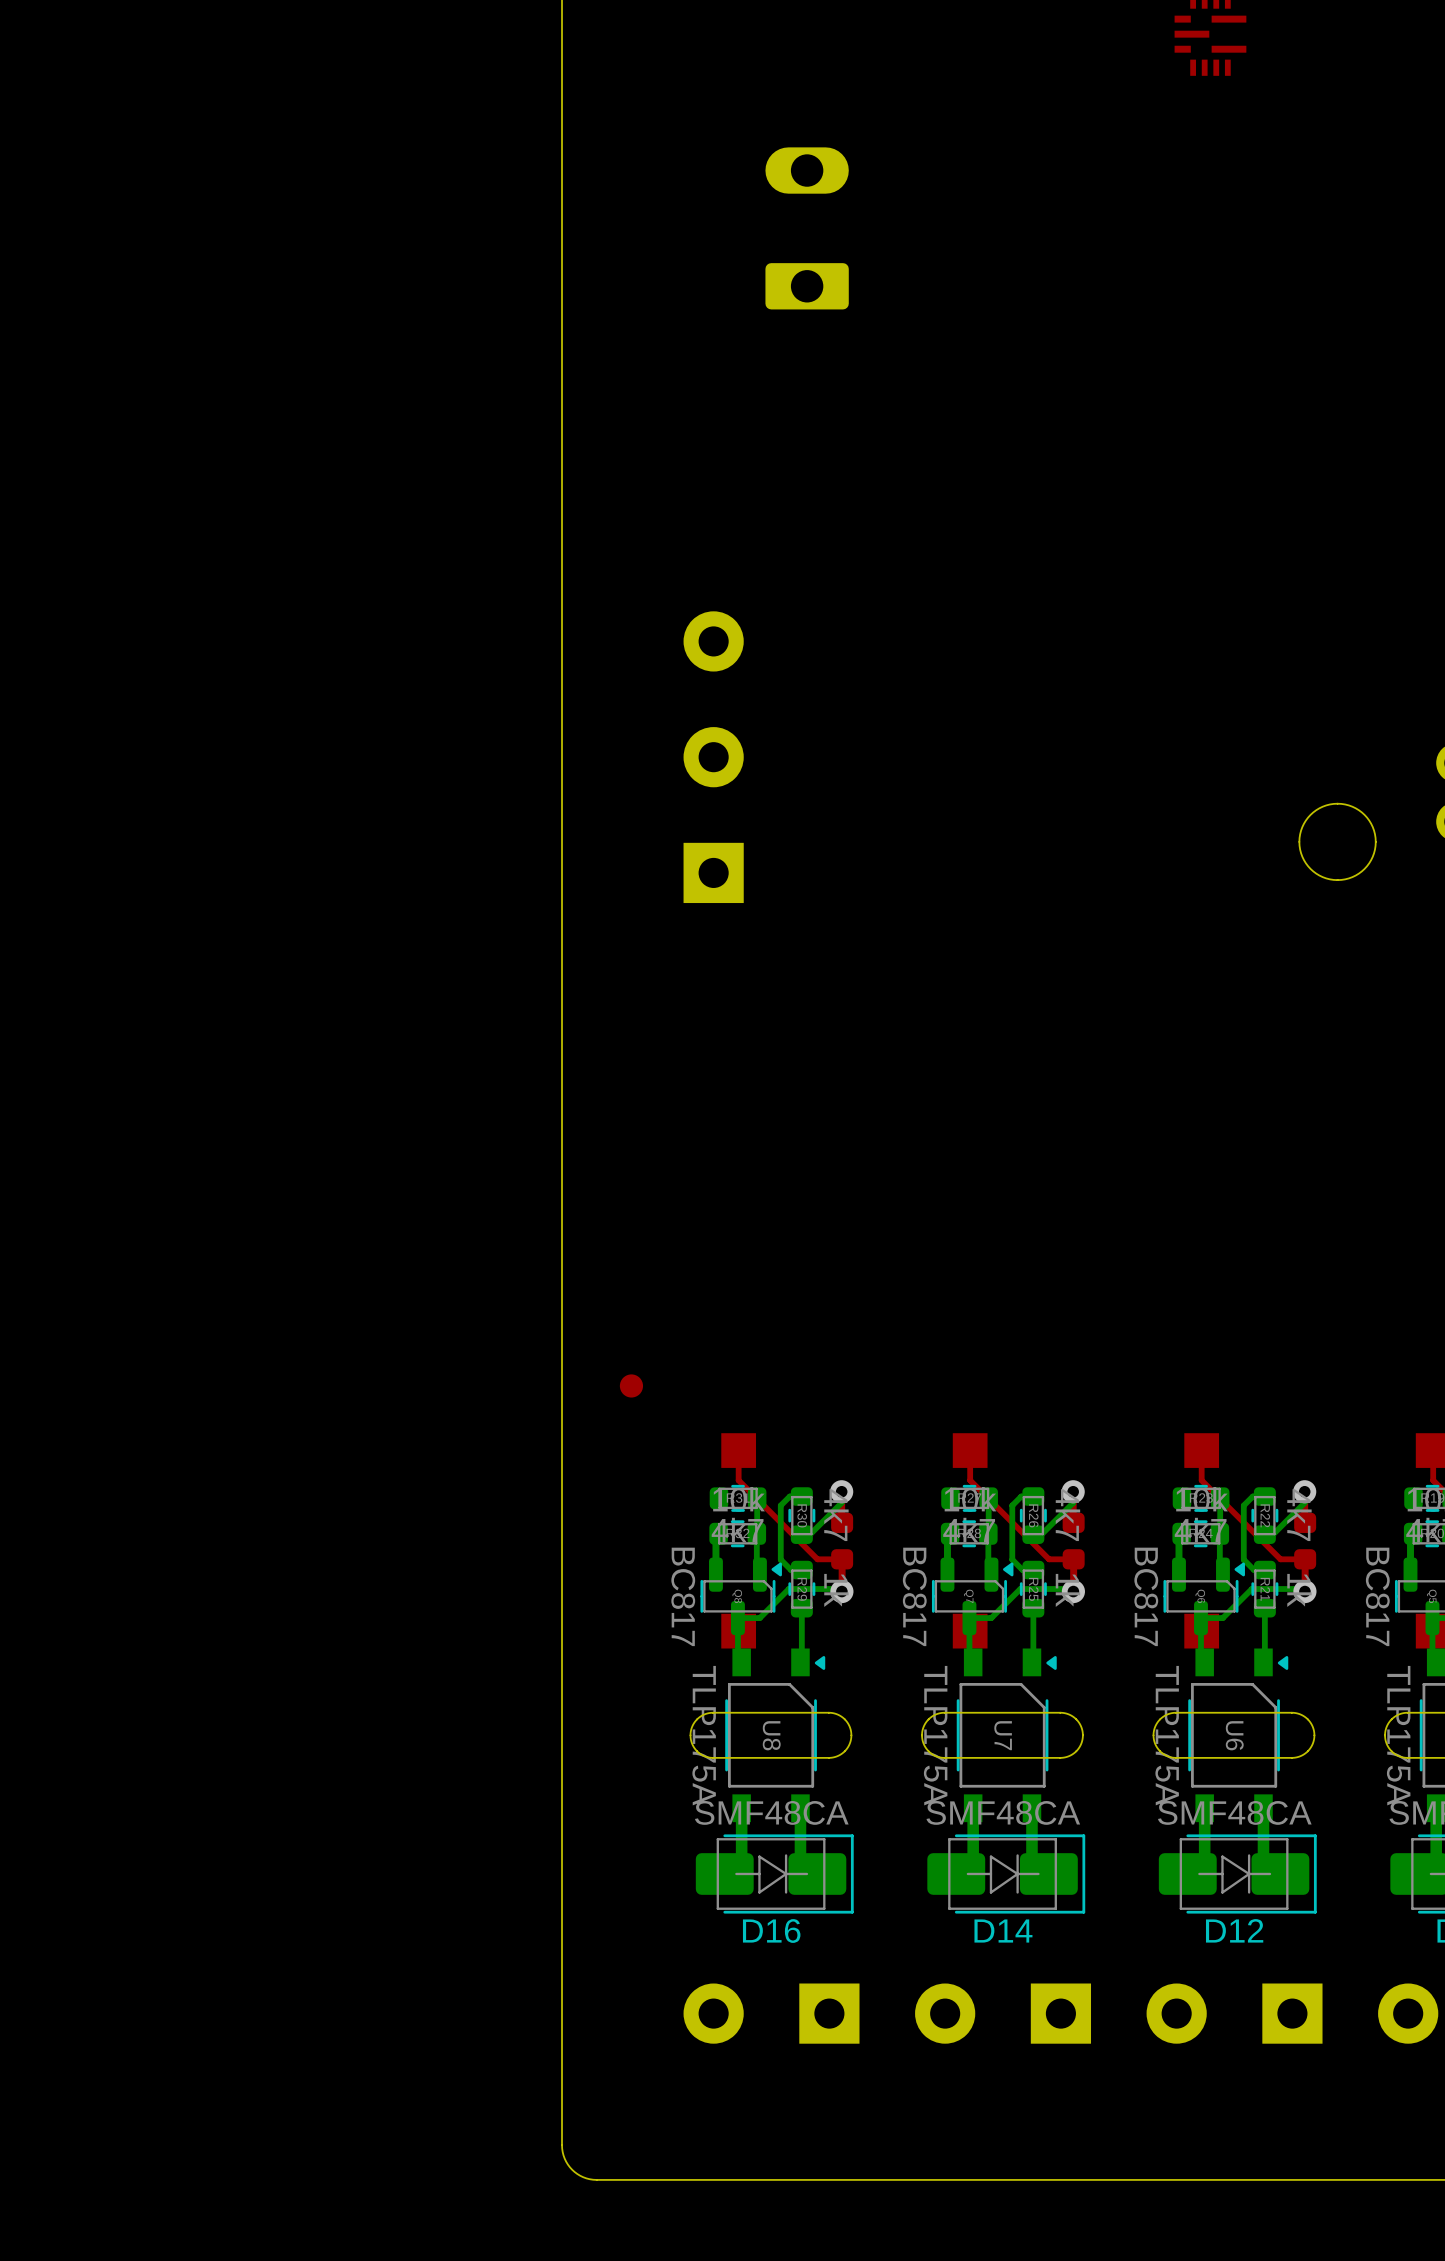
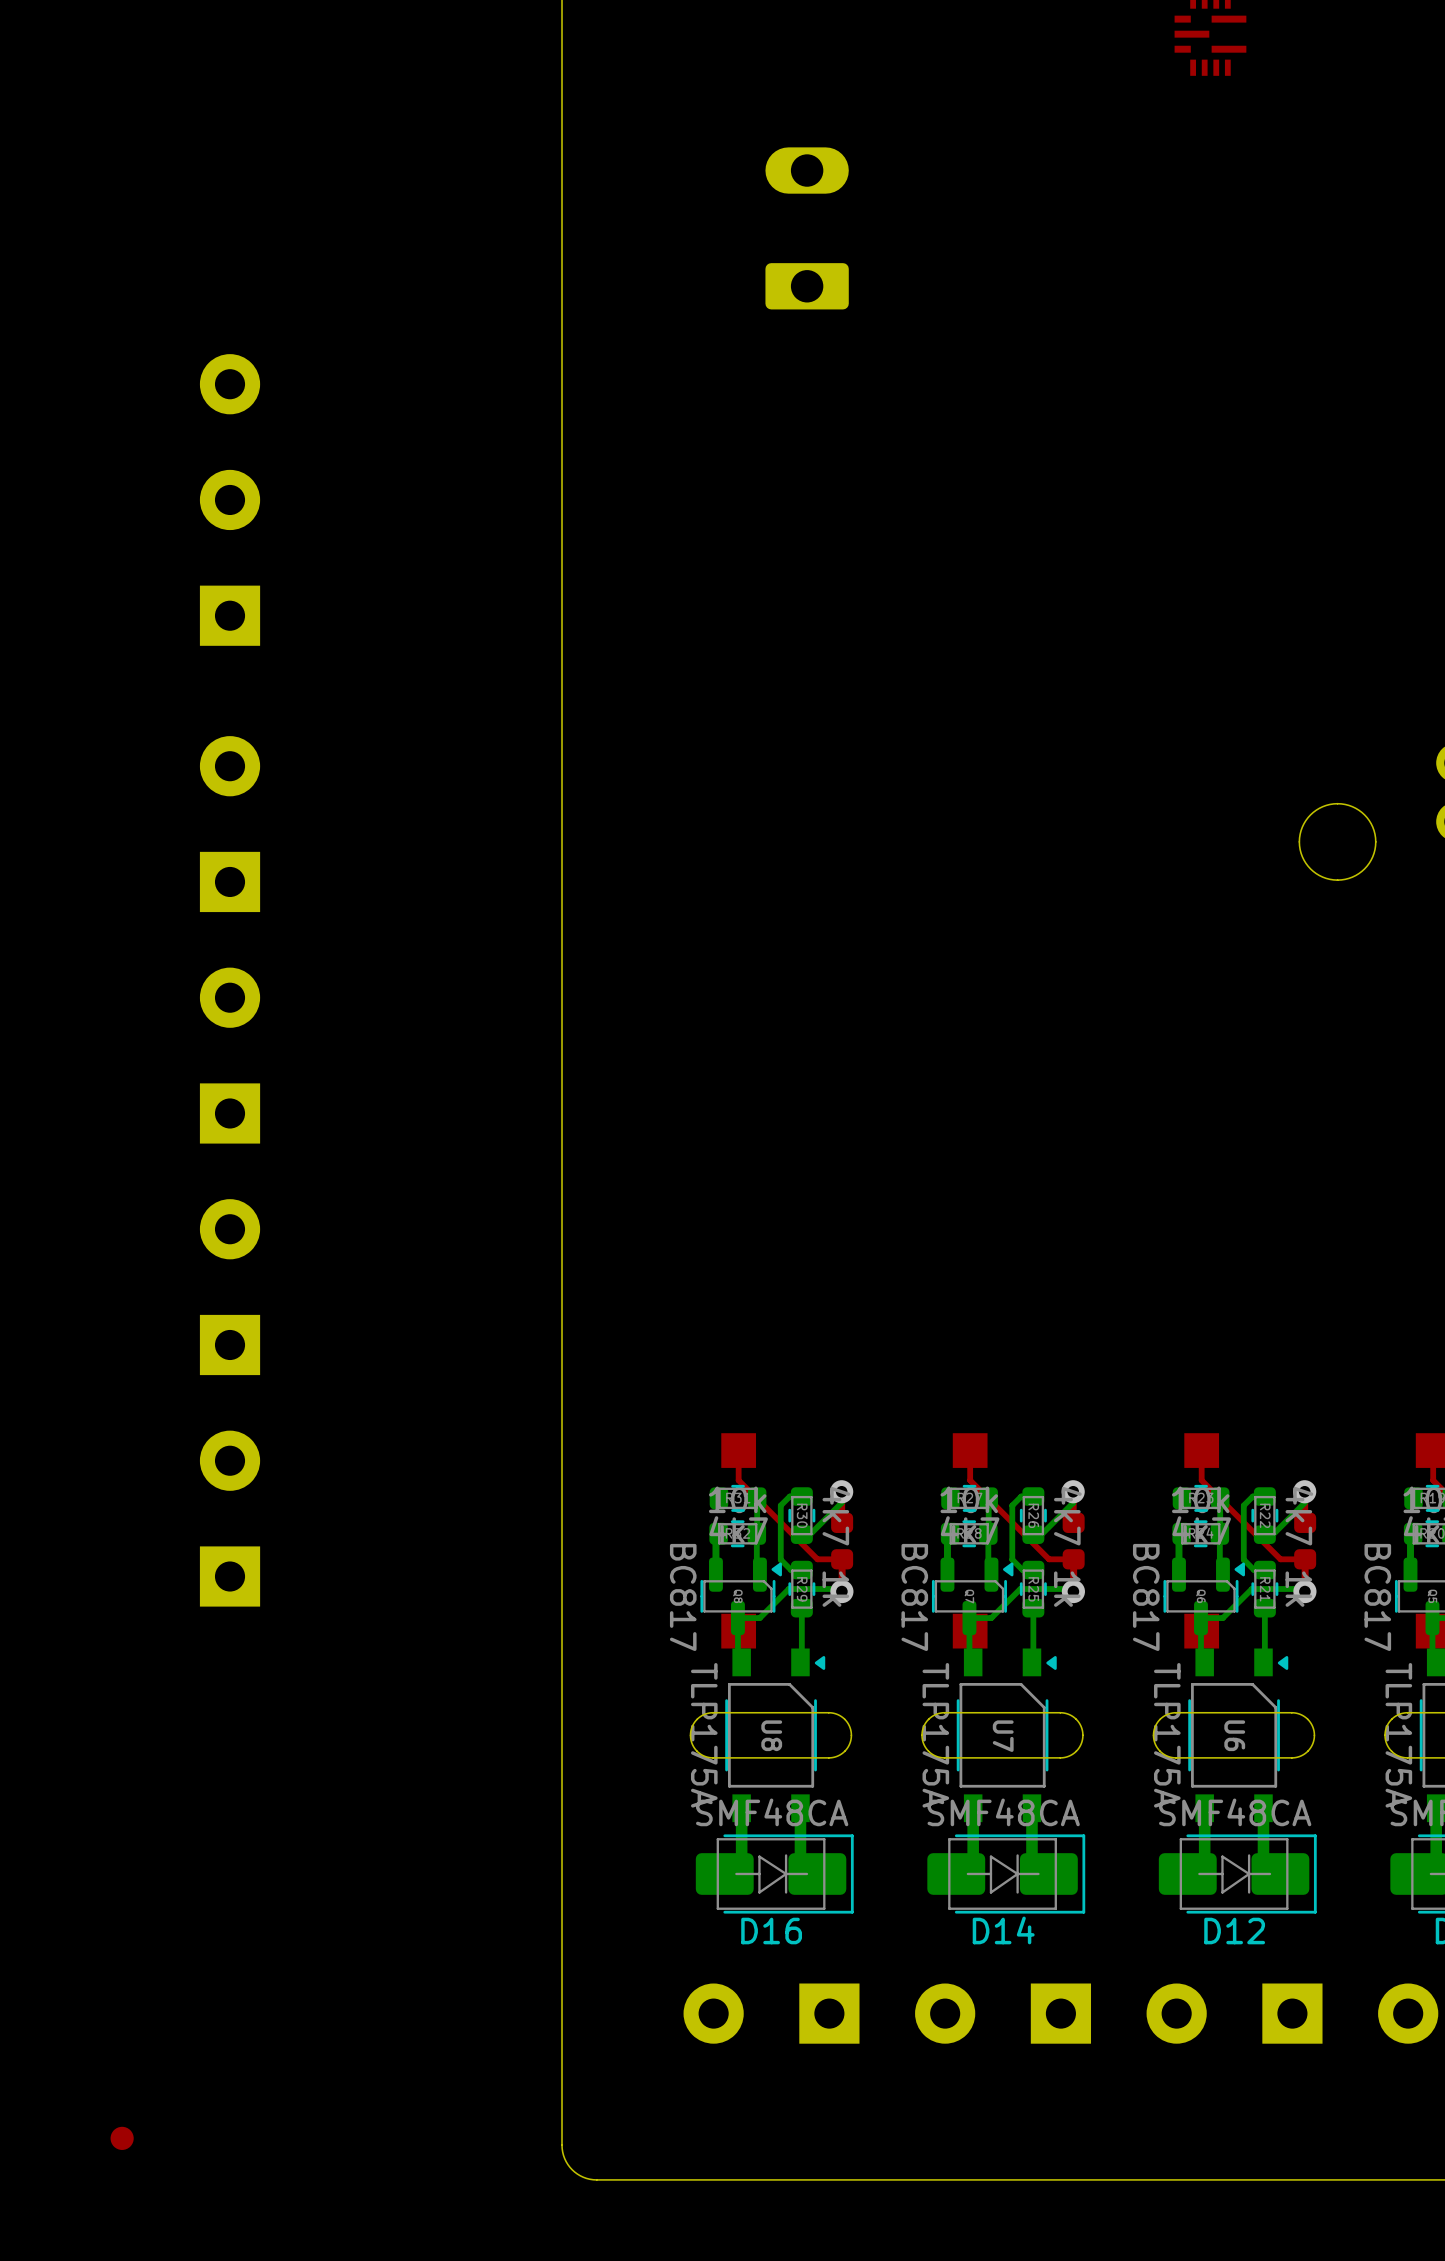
part position: (713, 757) -> (230, 499)
part: none -> (230, 824)
part: none -> (230, 1055)
part: none -> (230, 1287)
part: (631, 1385) -> none
part: none -> (230, 1518)
part: none -> (122, 2138)

